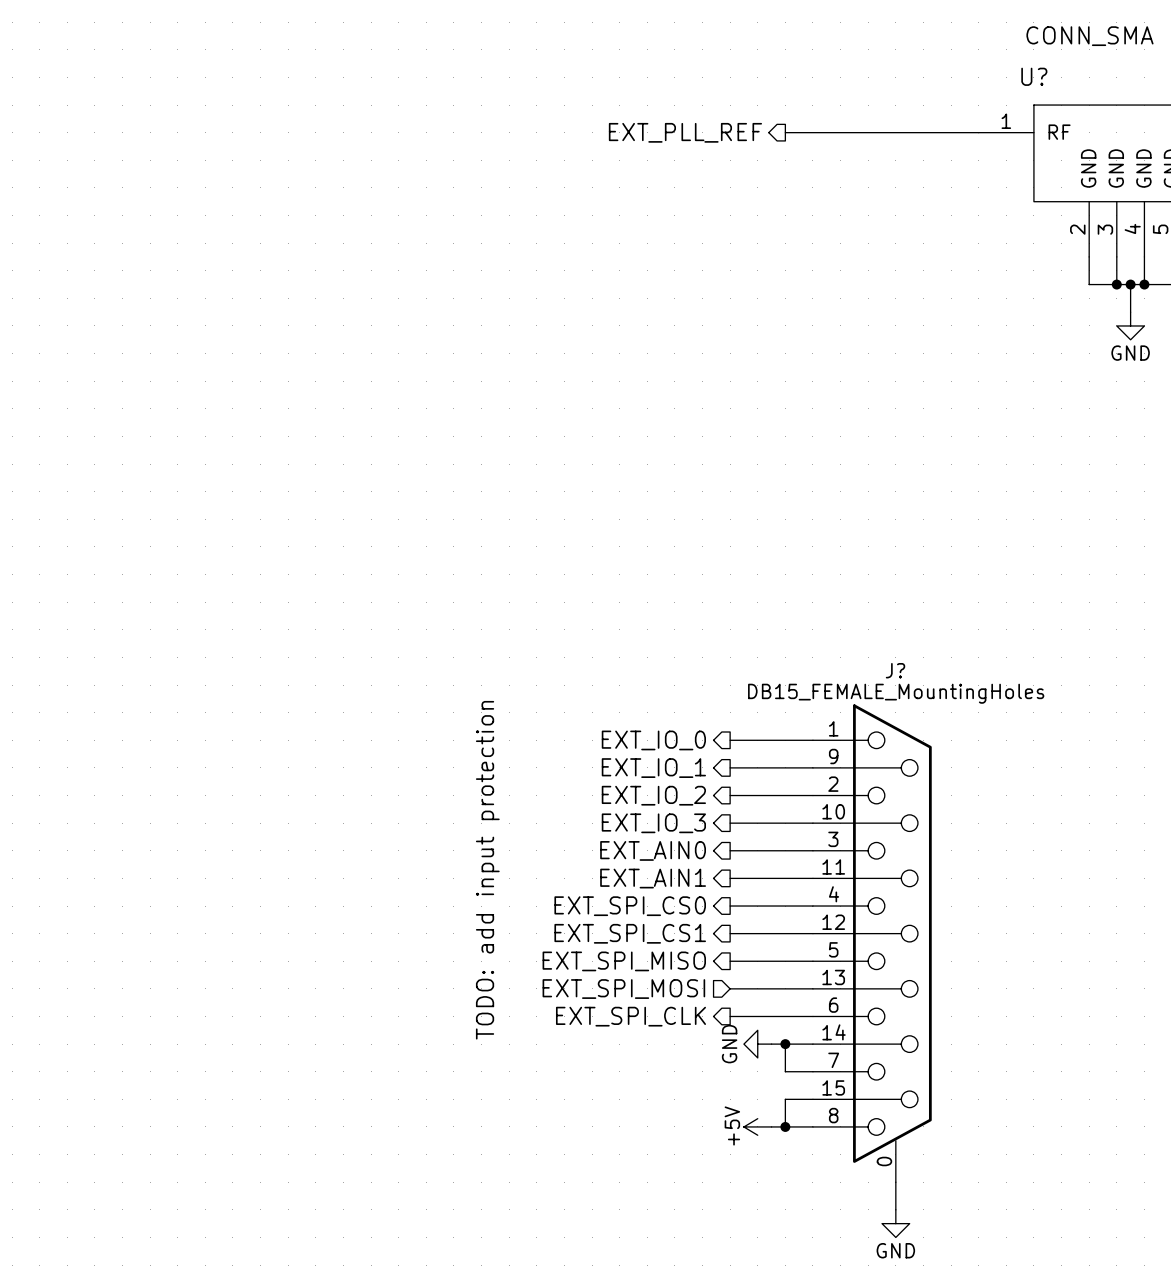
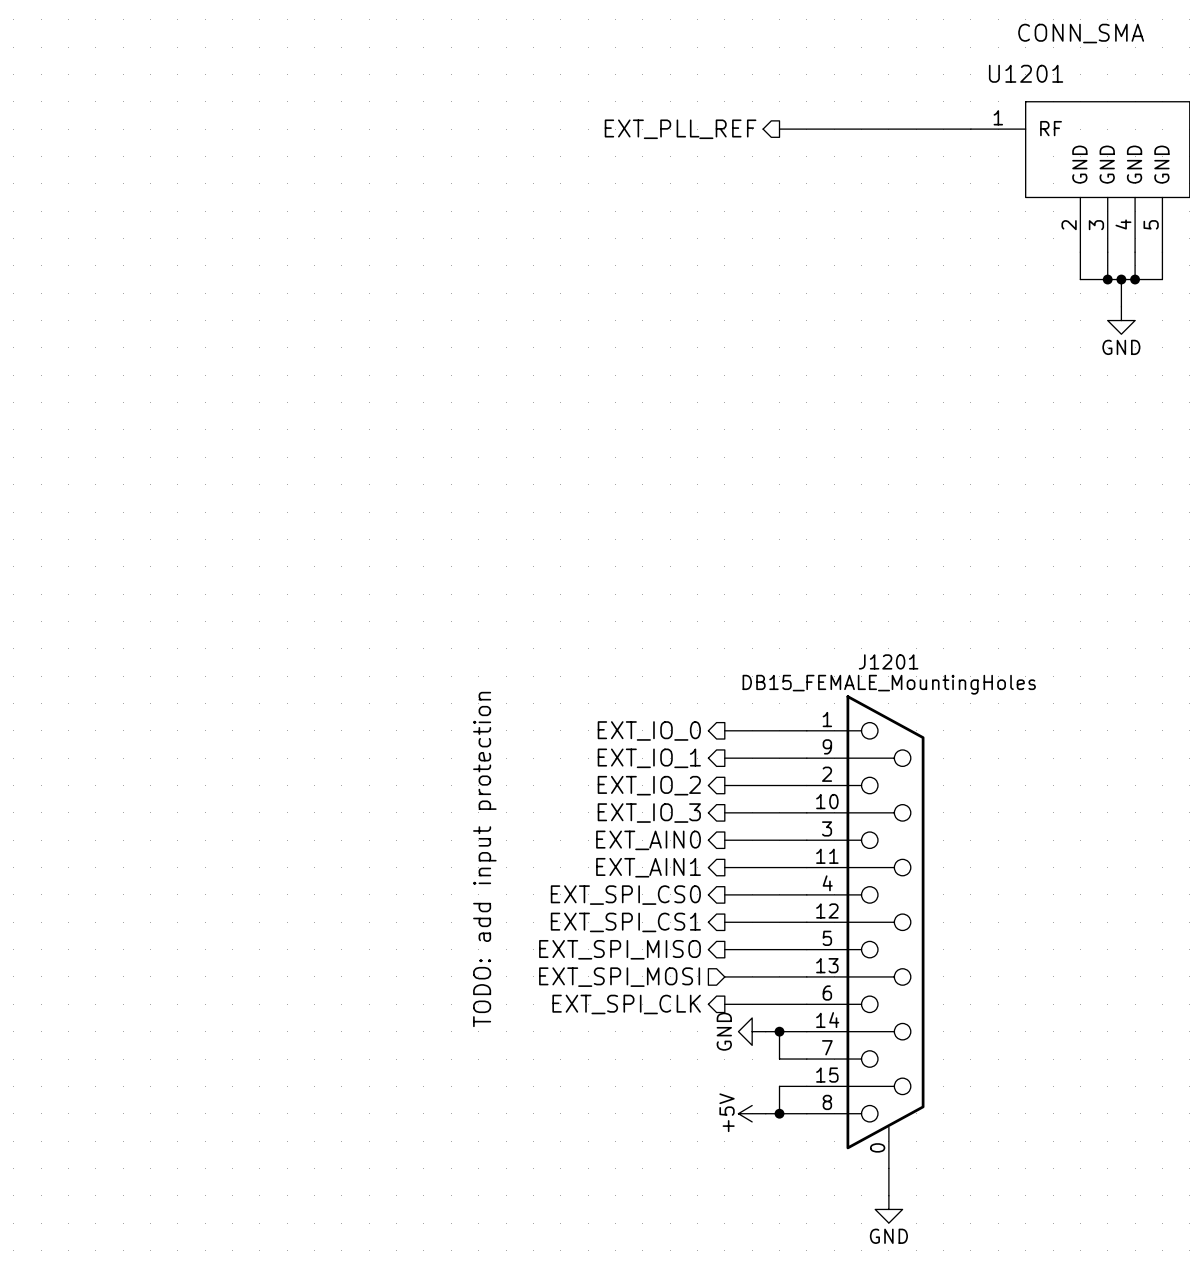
U? name: U? (1034, 76) -> U1201 (1026, 73)
J? name: J? (895, 670) -> J1201 (888, 661)

